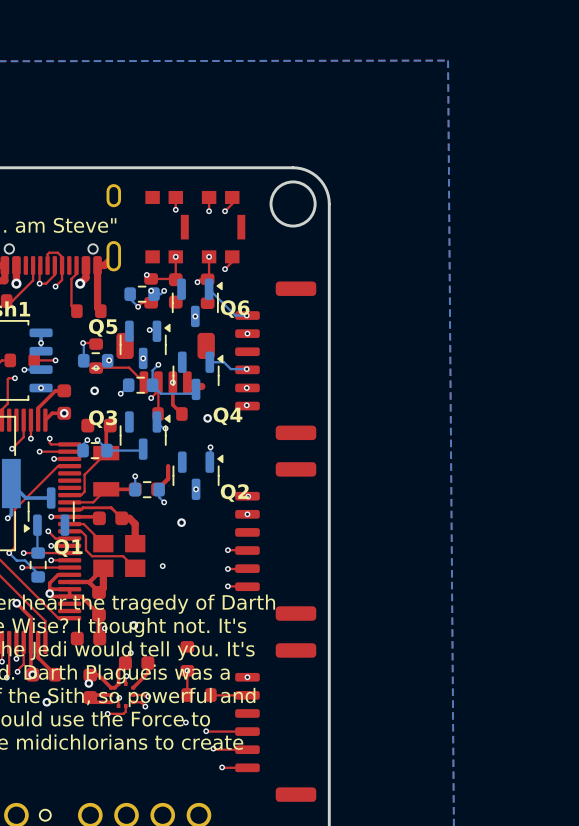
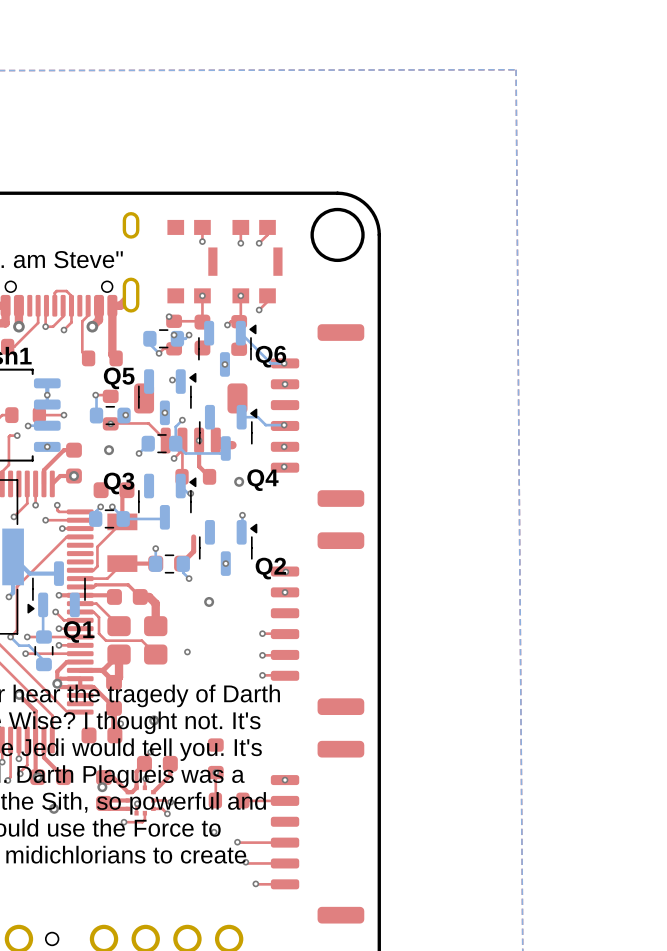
part footprint: [93, 534, 146, 577] -> [107, 616, 168, 665]

